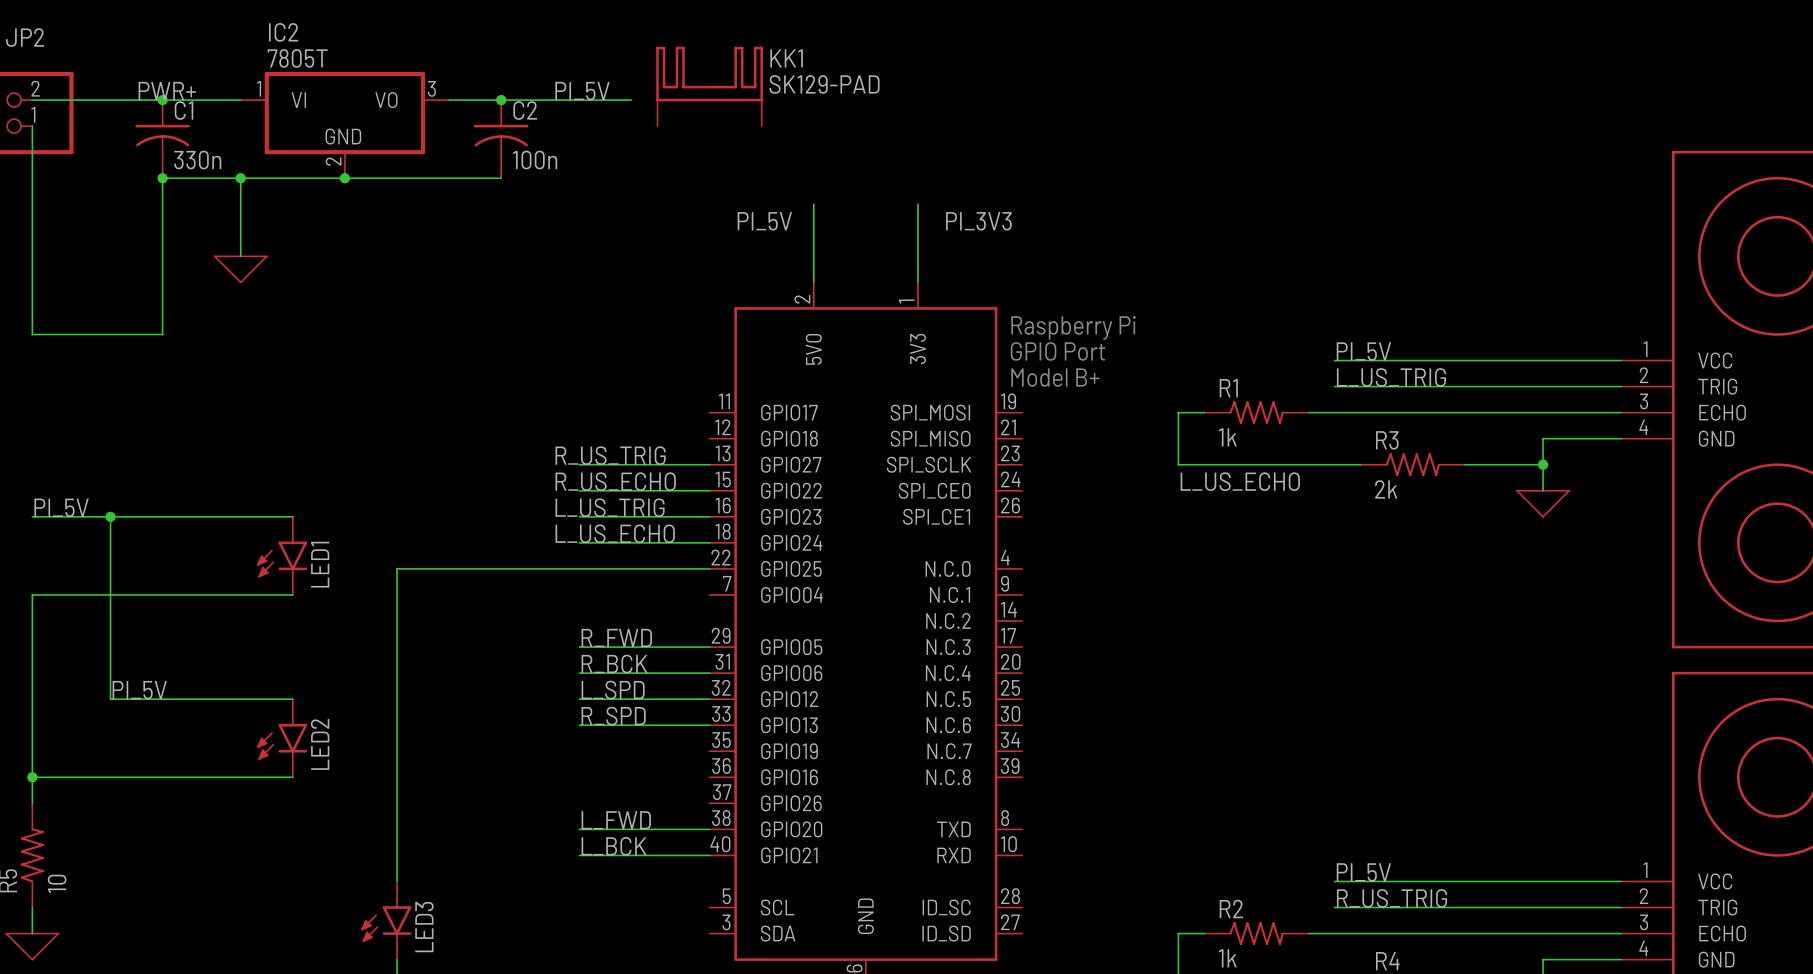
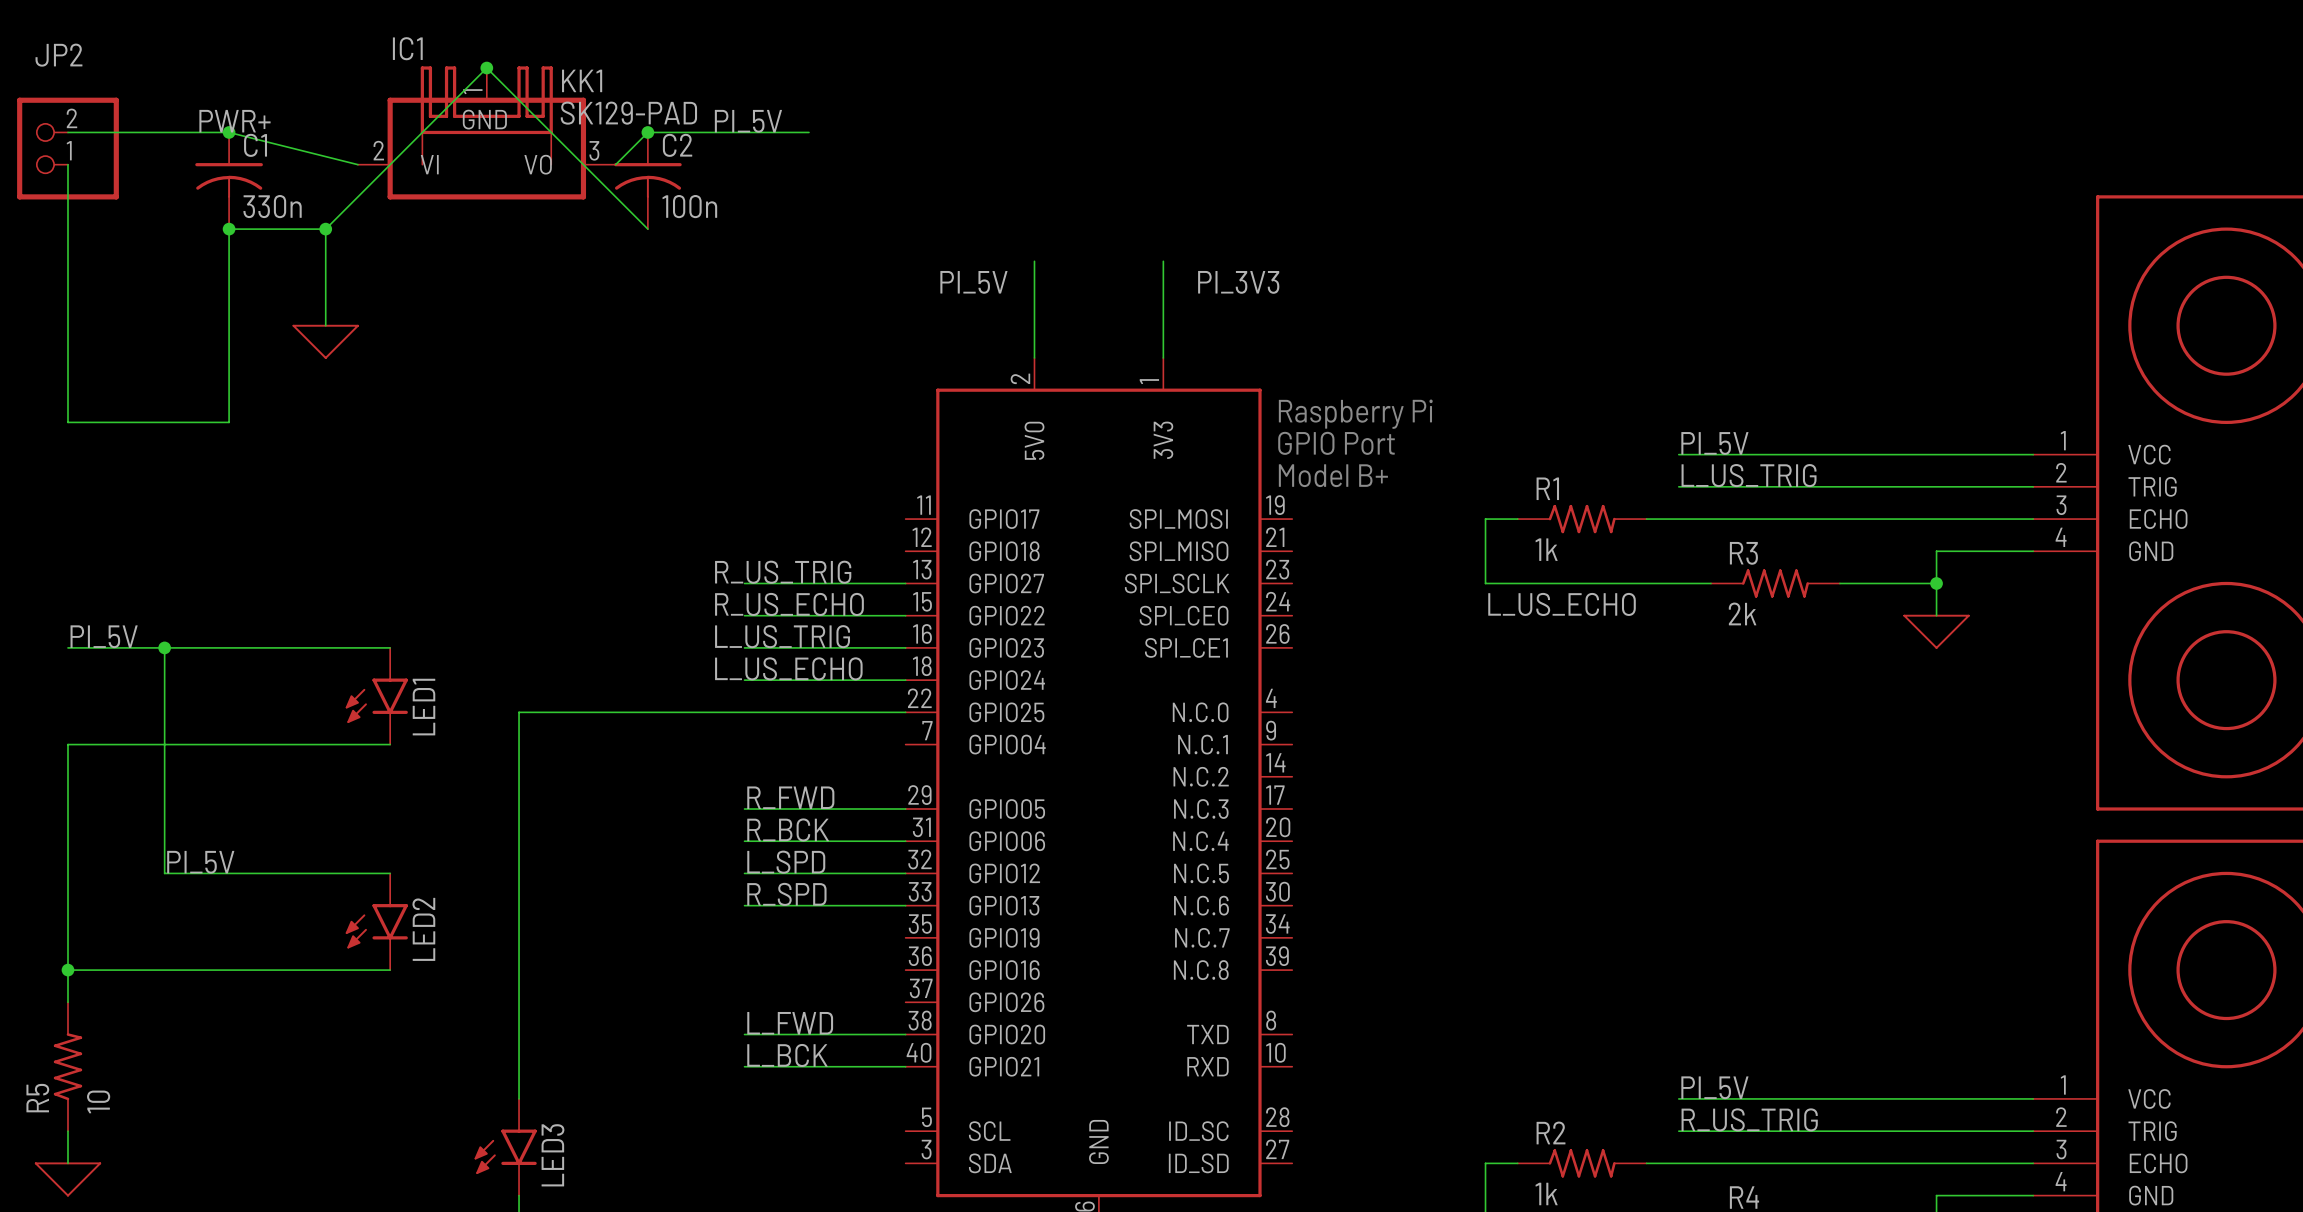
junction: none -> (486, 68)
KK1 position: (709, 86) -> (486, 115)
wire: (162, 100) (240, 100) -> (229, 132) (357, 164)
wire: (449, 100) (501, 100) -> (615, 164) (647, 132)
IC1: none -> (486, 133)
IC2: 7805T (344, 125) -> none
wire: (240, 178) (501, 178) -> (325, 229) (486, 68) (647, 229)
junction: (344, 178) -> none

